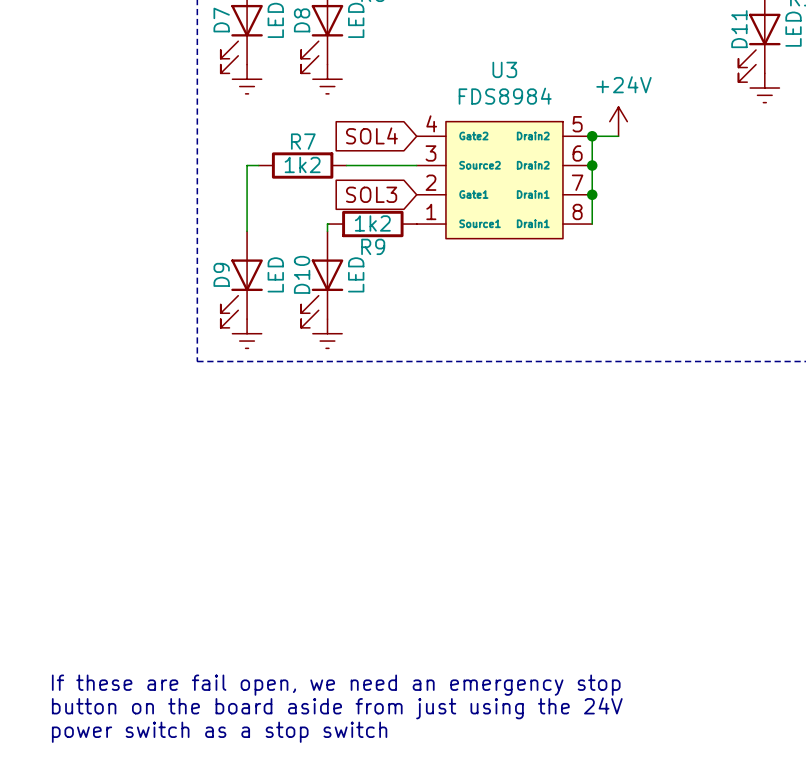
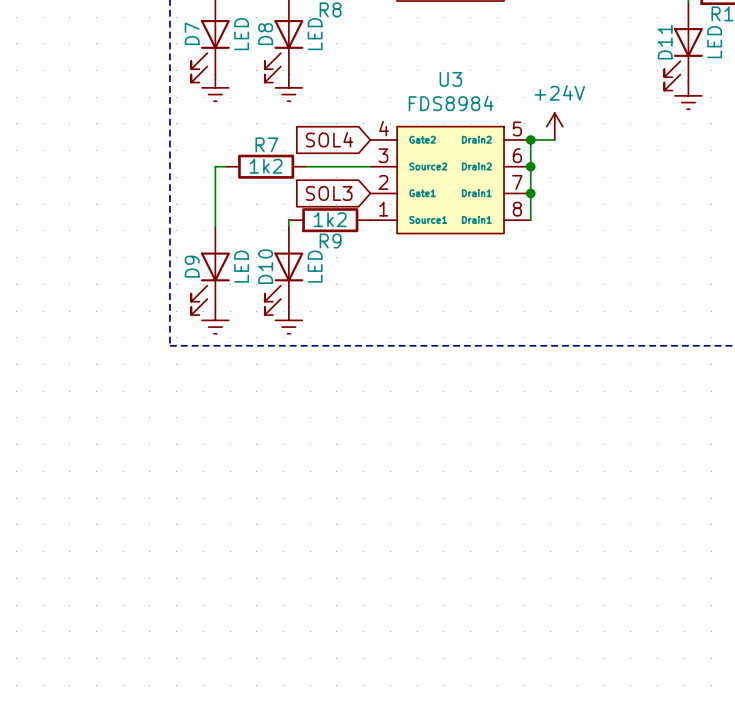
text: If these are fail open, we need an emergency stop (336, 685) -> none
text: button on the board aside from just using the 24V (337, 708) -> none
text: power switch as a stop switch (219, 732) -> none

